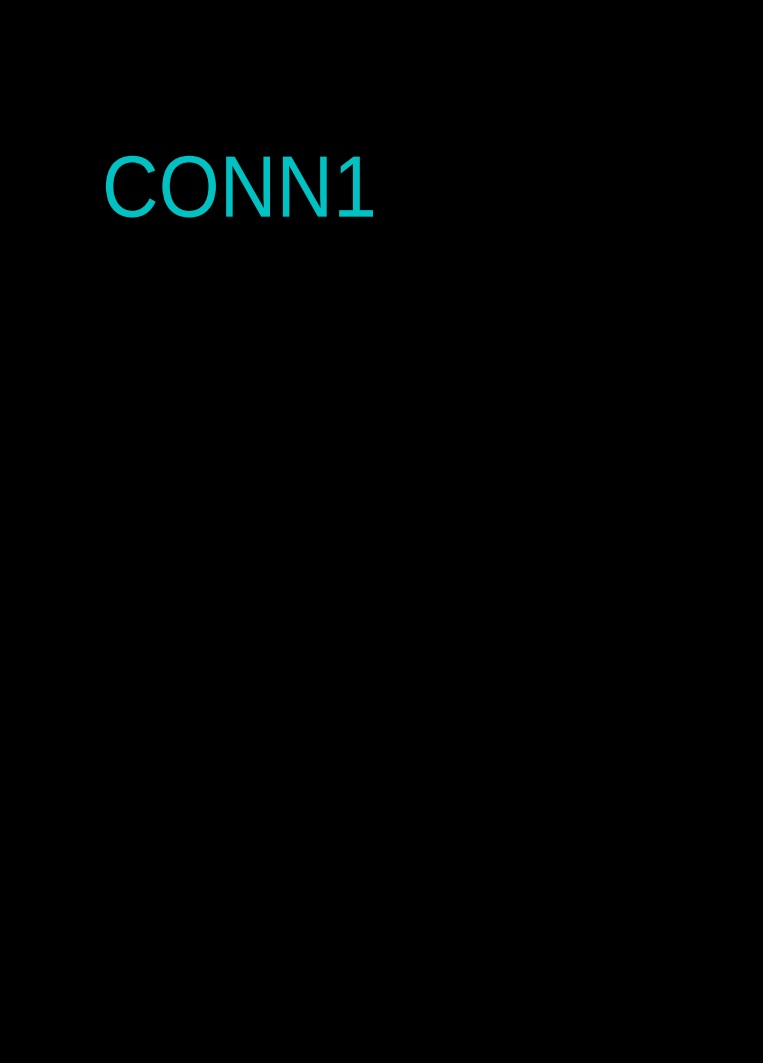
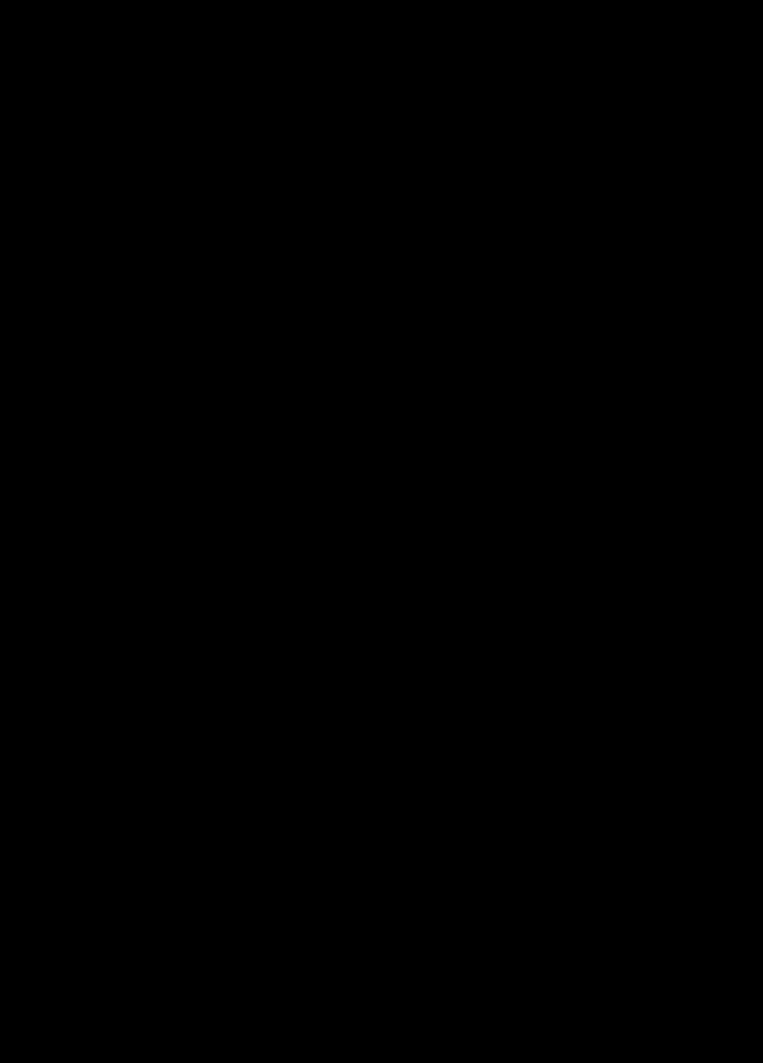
CONN1 name: CONN1 (239, 186) -> none

